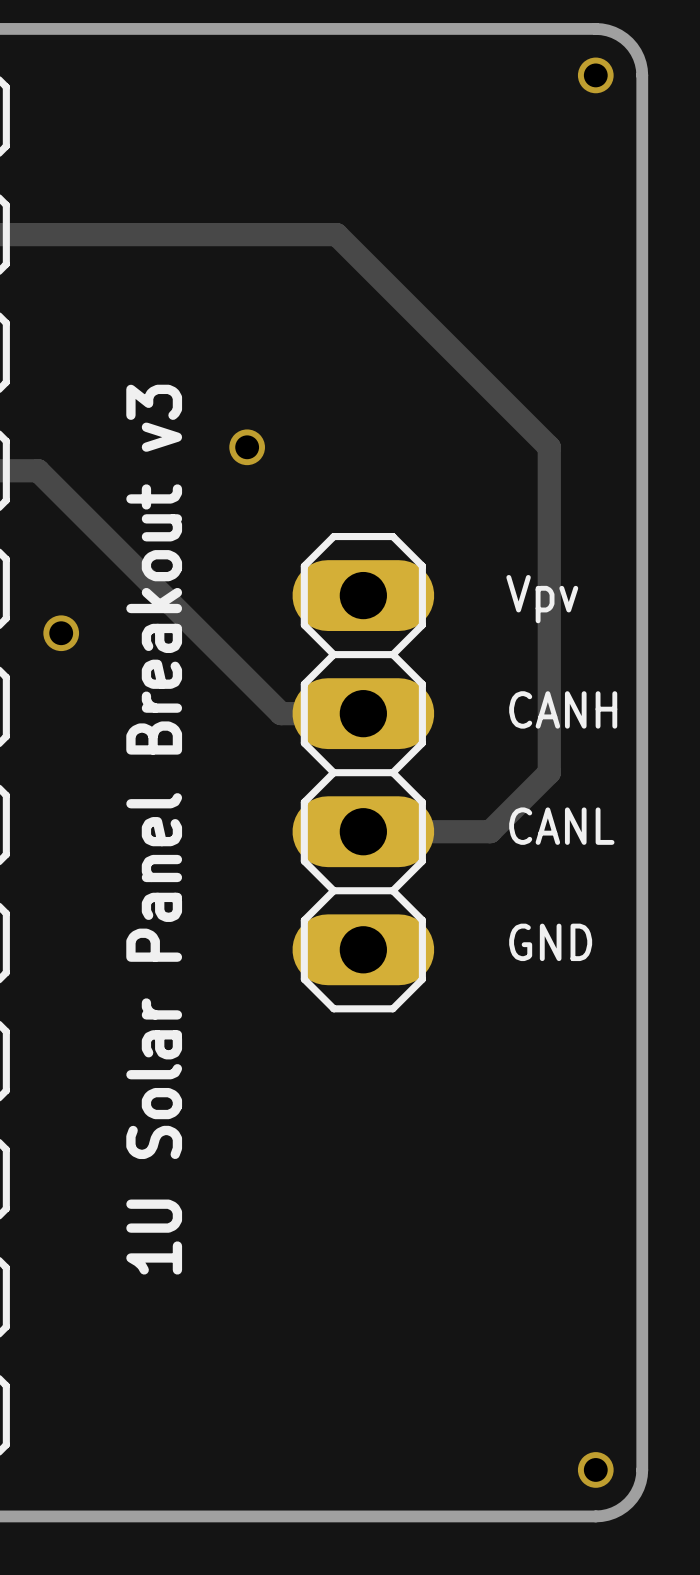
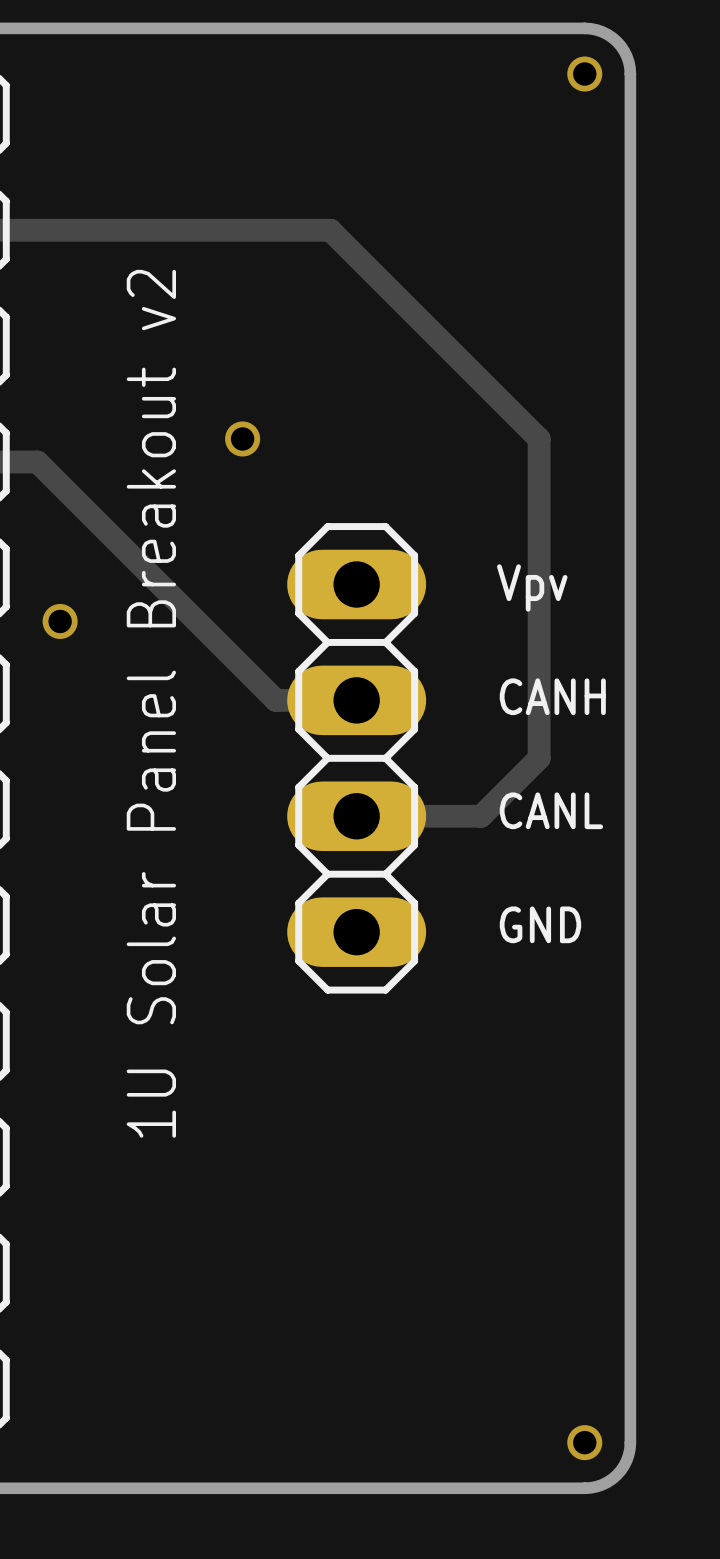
text: 1U Solar Panel Breakout v3 (154, 829) -> 1U Solar Panel Breakout v2 (151, 703)

